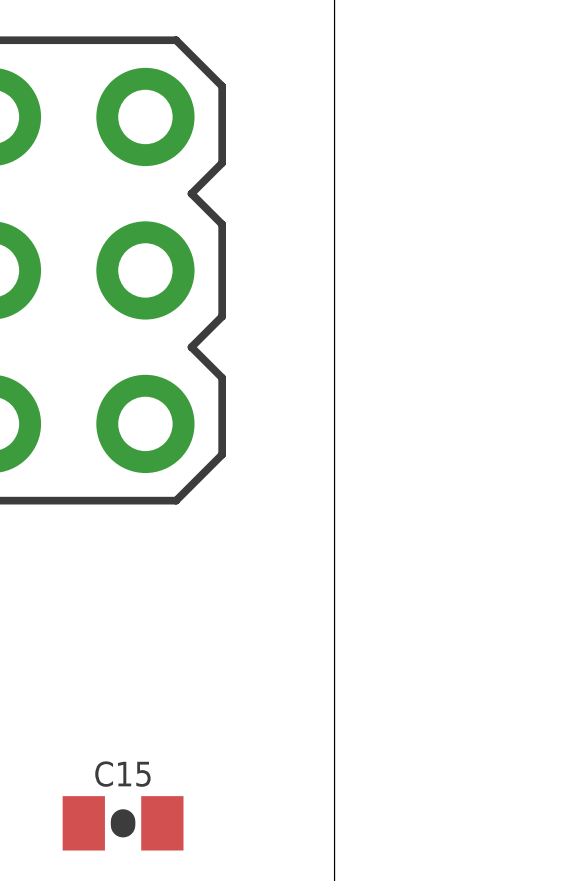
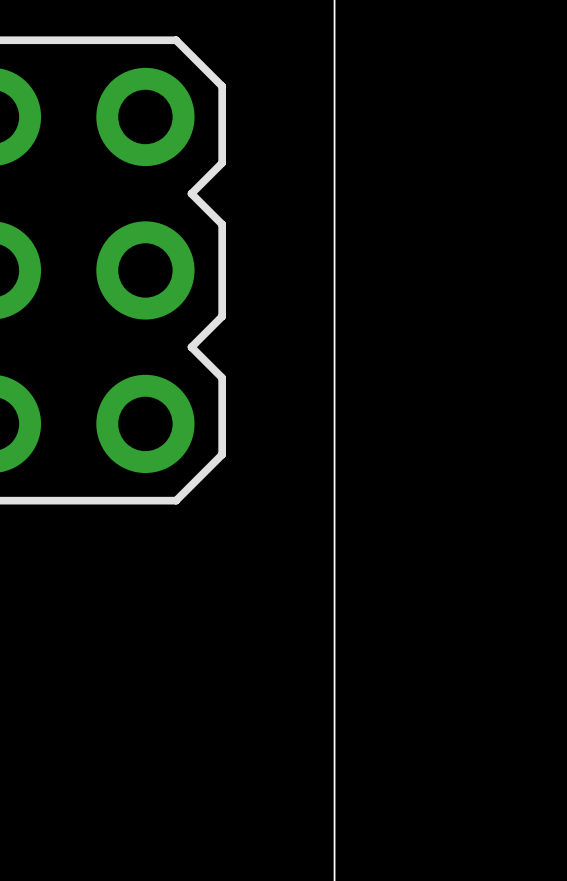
C15: (123, 823) -> none

